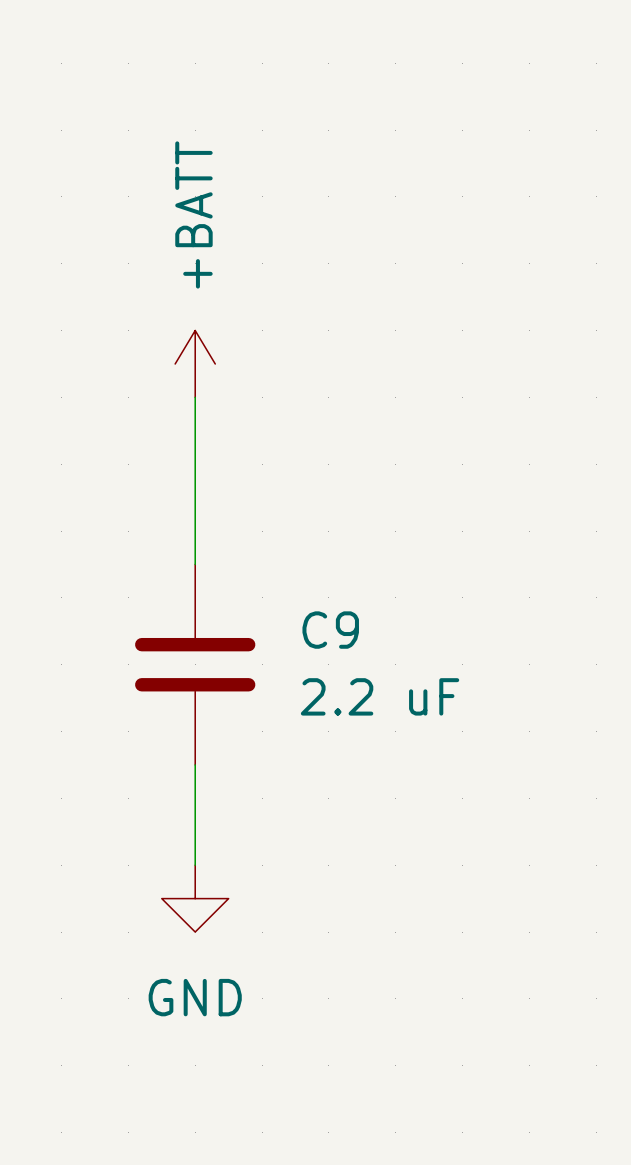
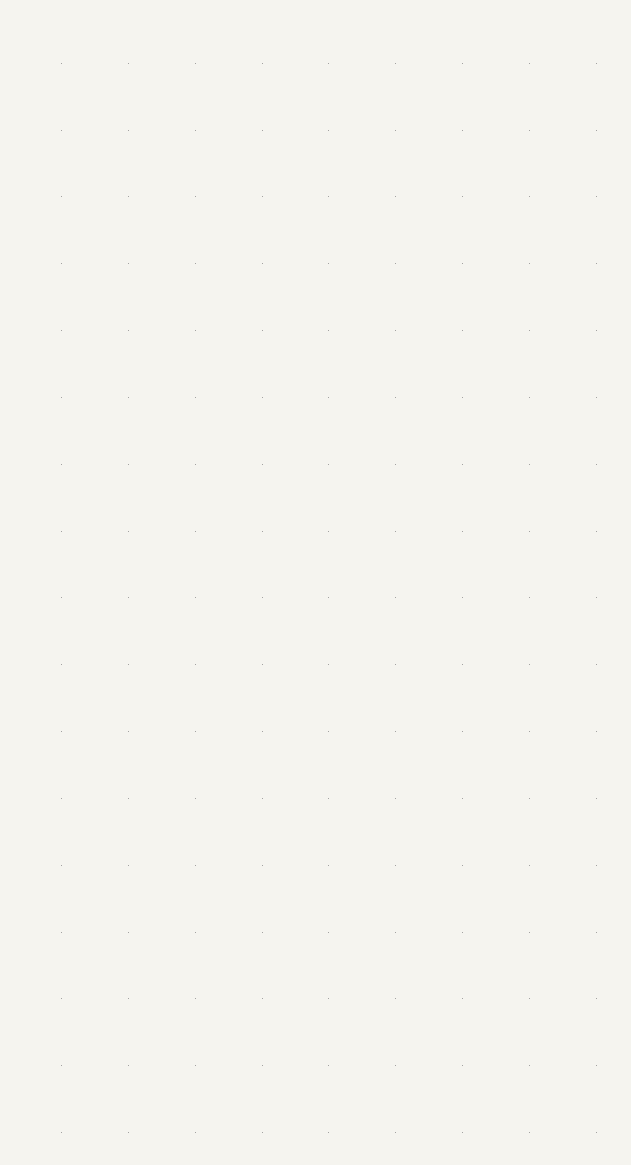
power symbol: +BATT (195, 363) -> none
wire: (195, 397) (195, 564) -> none
C9: 2.2 uF (195, 664) -> none
wire: (195, 764) (195, 865) -> none
power symbol: GND (195, 898) -> none

